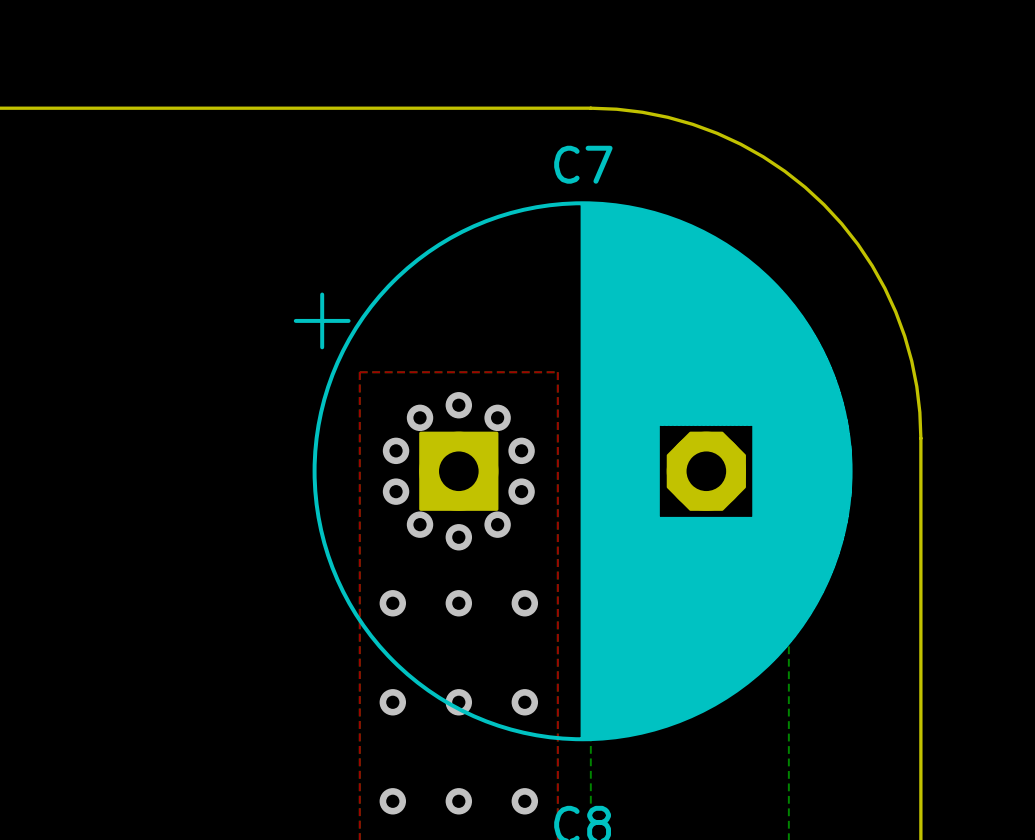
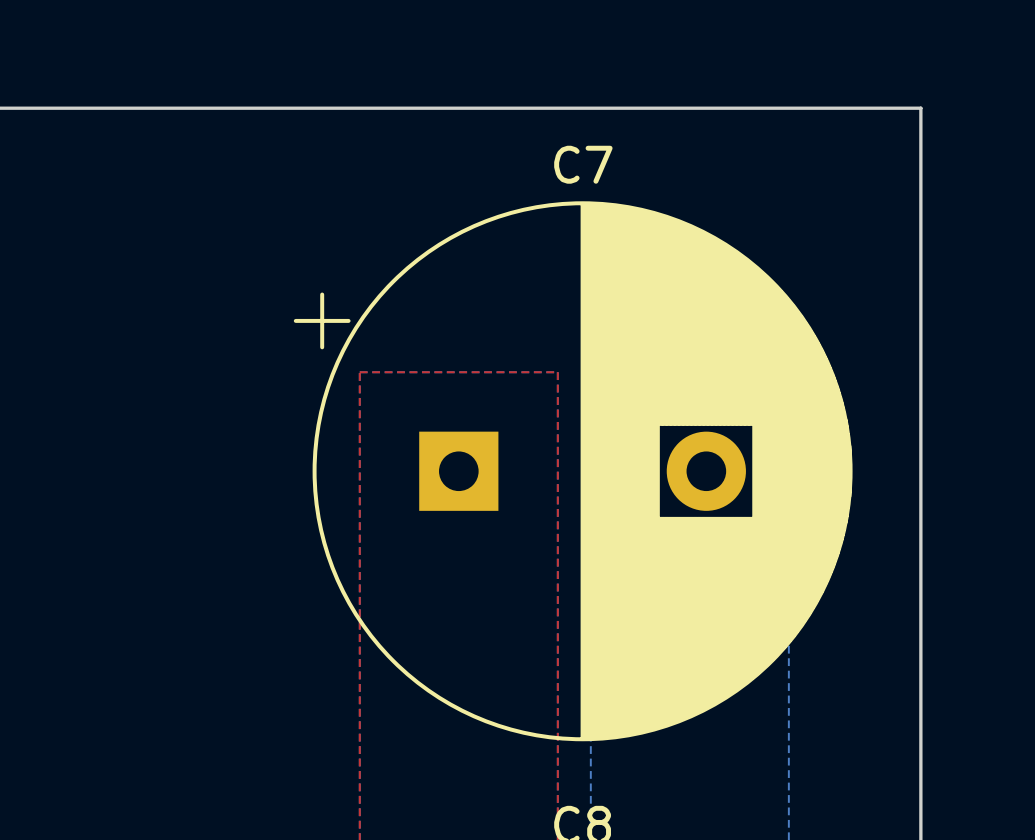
board edge: (590, 108) (642, 112) (692, 124) (717, 133) (763, 156) (805, 187) (824, 204) (857, 244) (884, 288) (895, 311) (911, 361) (916, 386) (920, 438) -> (590, 108) (920, 108) (920, 438)
C7 footprint: [293, 201, 853, 742] -> [293, 201, 853, 742]
via: (458, 405) -> none
via: (420, 417) -> none
via: (497, 417) -> none
via: (396, 450) -> none
via: (521, 450) -> none
via: (396, 491) -> none
via: (521, 491) -> none
via: (420, 524) -> none
via: (497, 524) -> none
via: (458, 537) -> none
via: (392, 603) -> none
via: (458, 603) -> none
via: (524, 603) -> none
via: (392, 702) -> none
via: (458, 702) -> none
via: (524, 702) -> none
via: (392, 801) -> none
via: (458, 801) -> none
via: (524, 801) -> none

